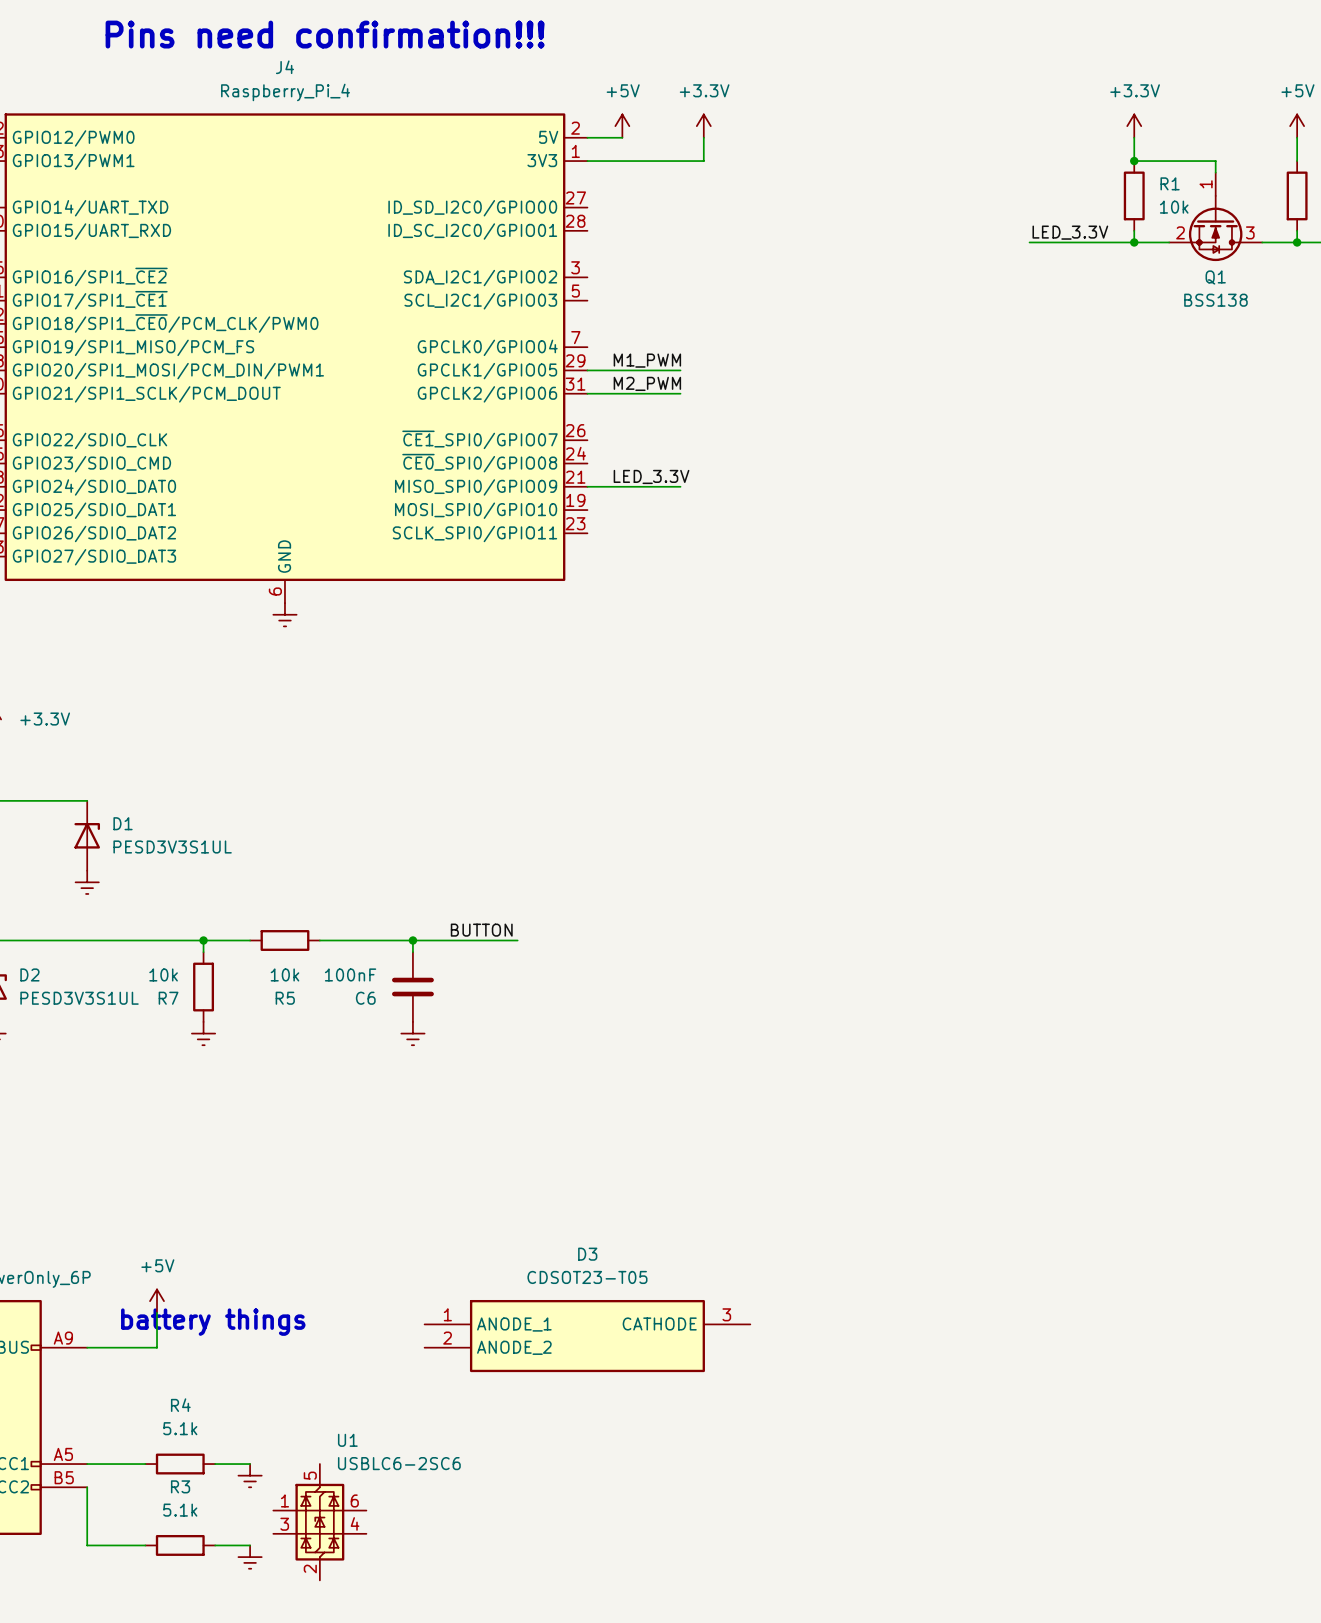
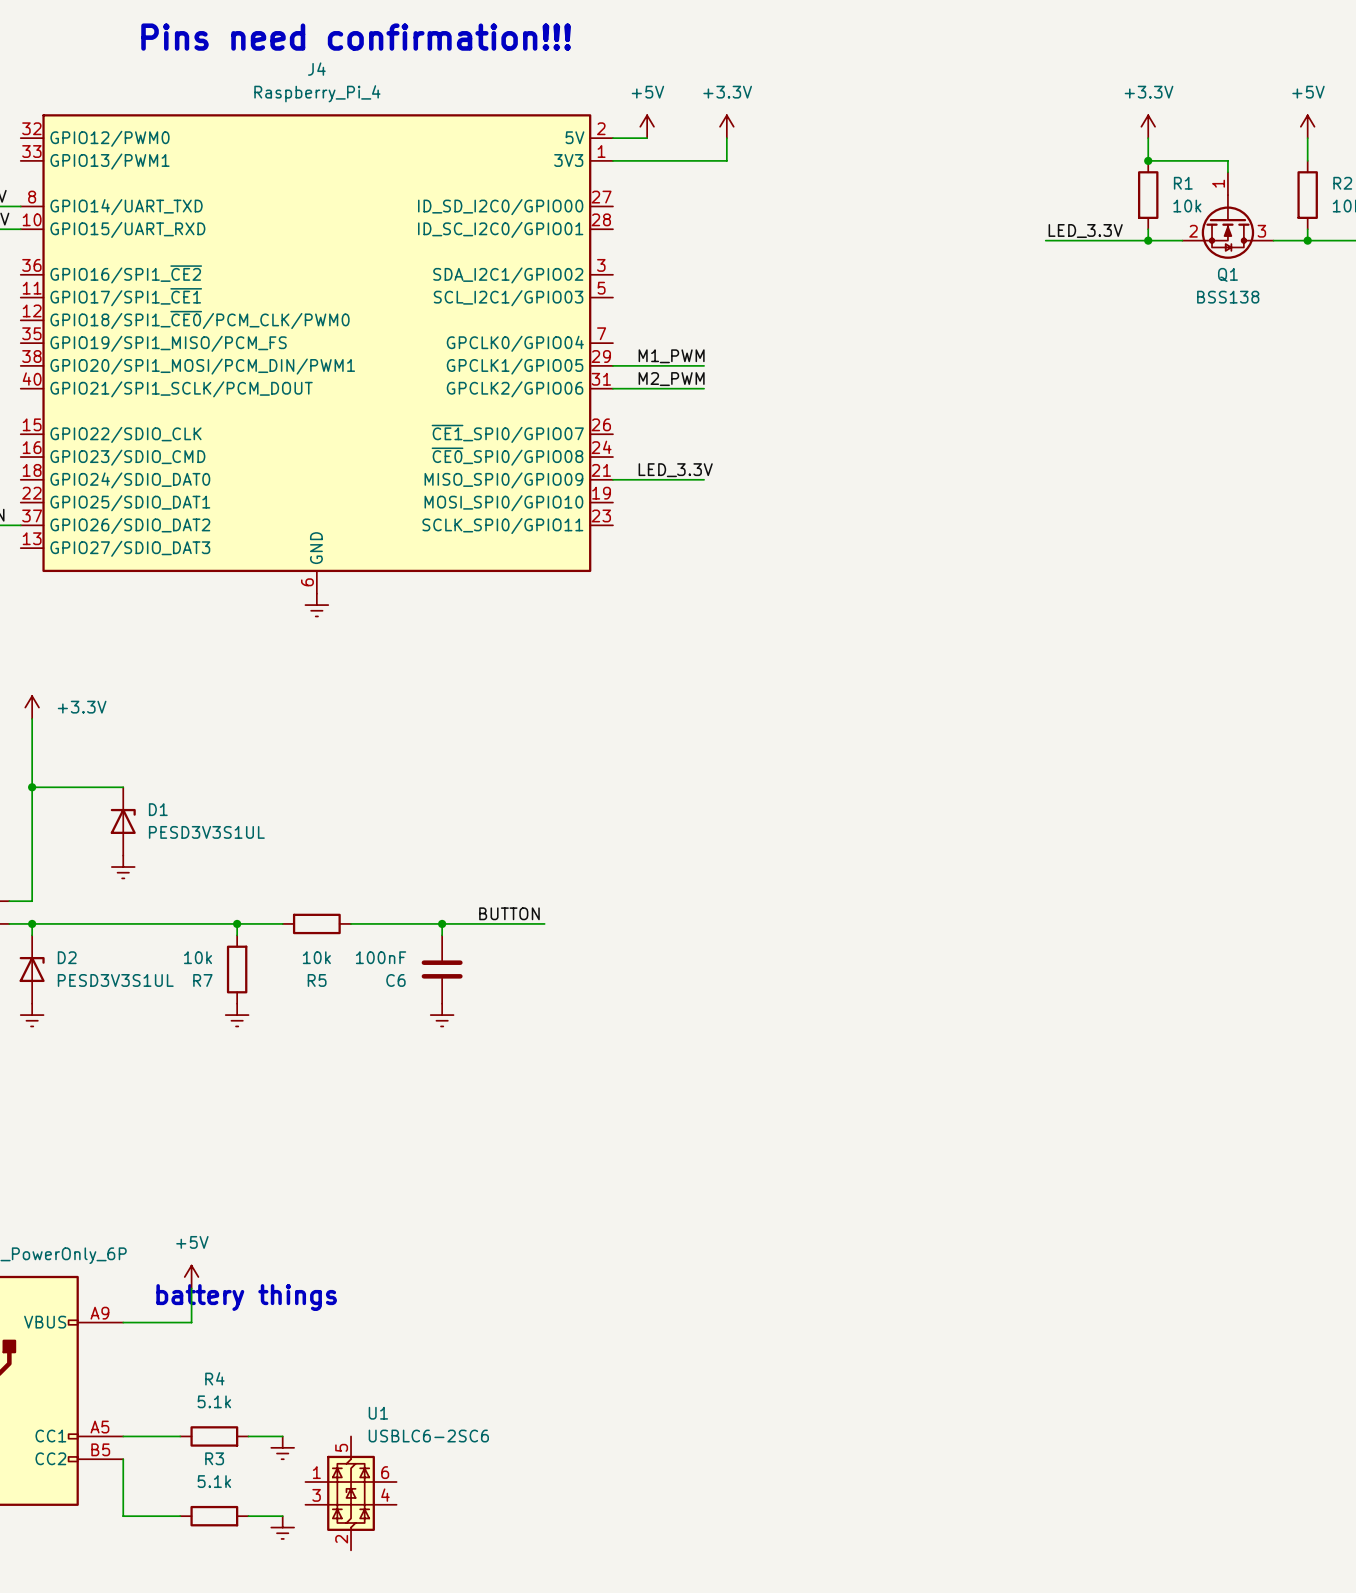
D3: CDSOT23-T05 (587, 1336) -> none

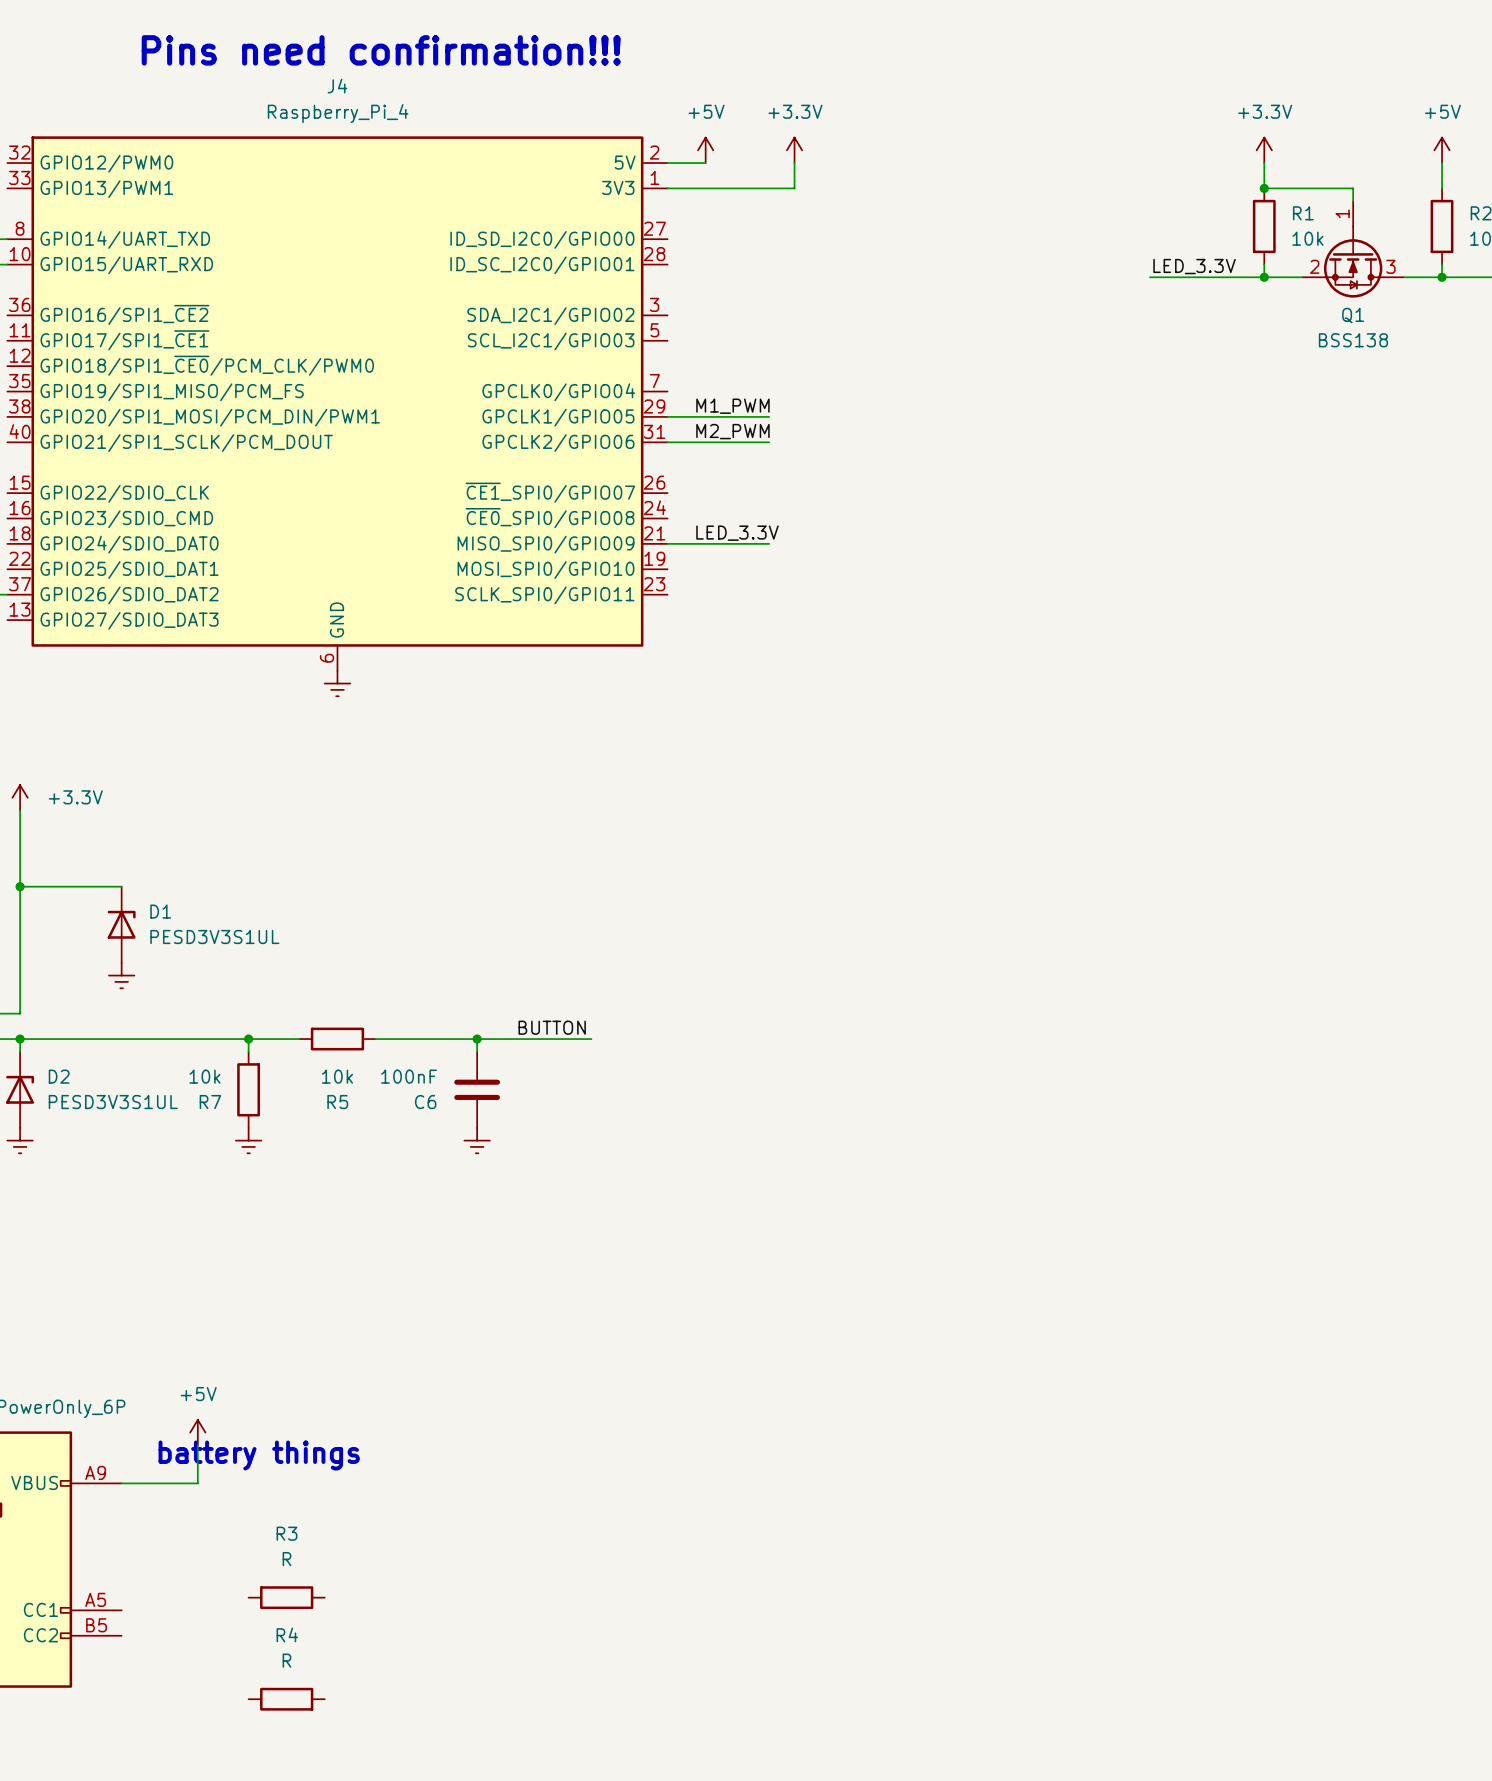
R4 value: 5.1k (214, 1401) -> R (286, 1660)
wire: (123, 1436) (180, 1436) -> none
R4 position: (214, 1436) -> (286, 1699)
wire: (248, 1436) (282, 1436) -> none
power symbol: (282, 1447) -> none
wire: (123, 1459) (123, 1516) (180, 1516) -> none
R3 value: 5.1k (214, 1481) -> R (286, 1559)
U1: USBLC6-2SC6 (351, 1493) -> none
R3 position: (214, 1516) -> (286, 1597)
wire: (248, 1516) (282, 1516) -> none
power symbol: (282, 1527) -> none

